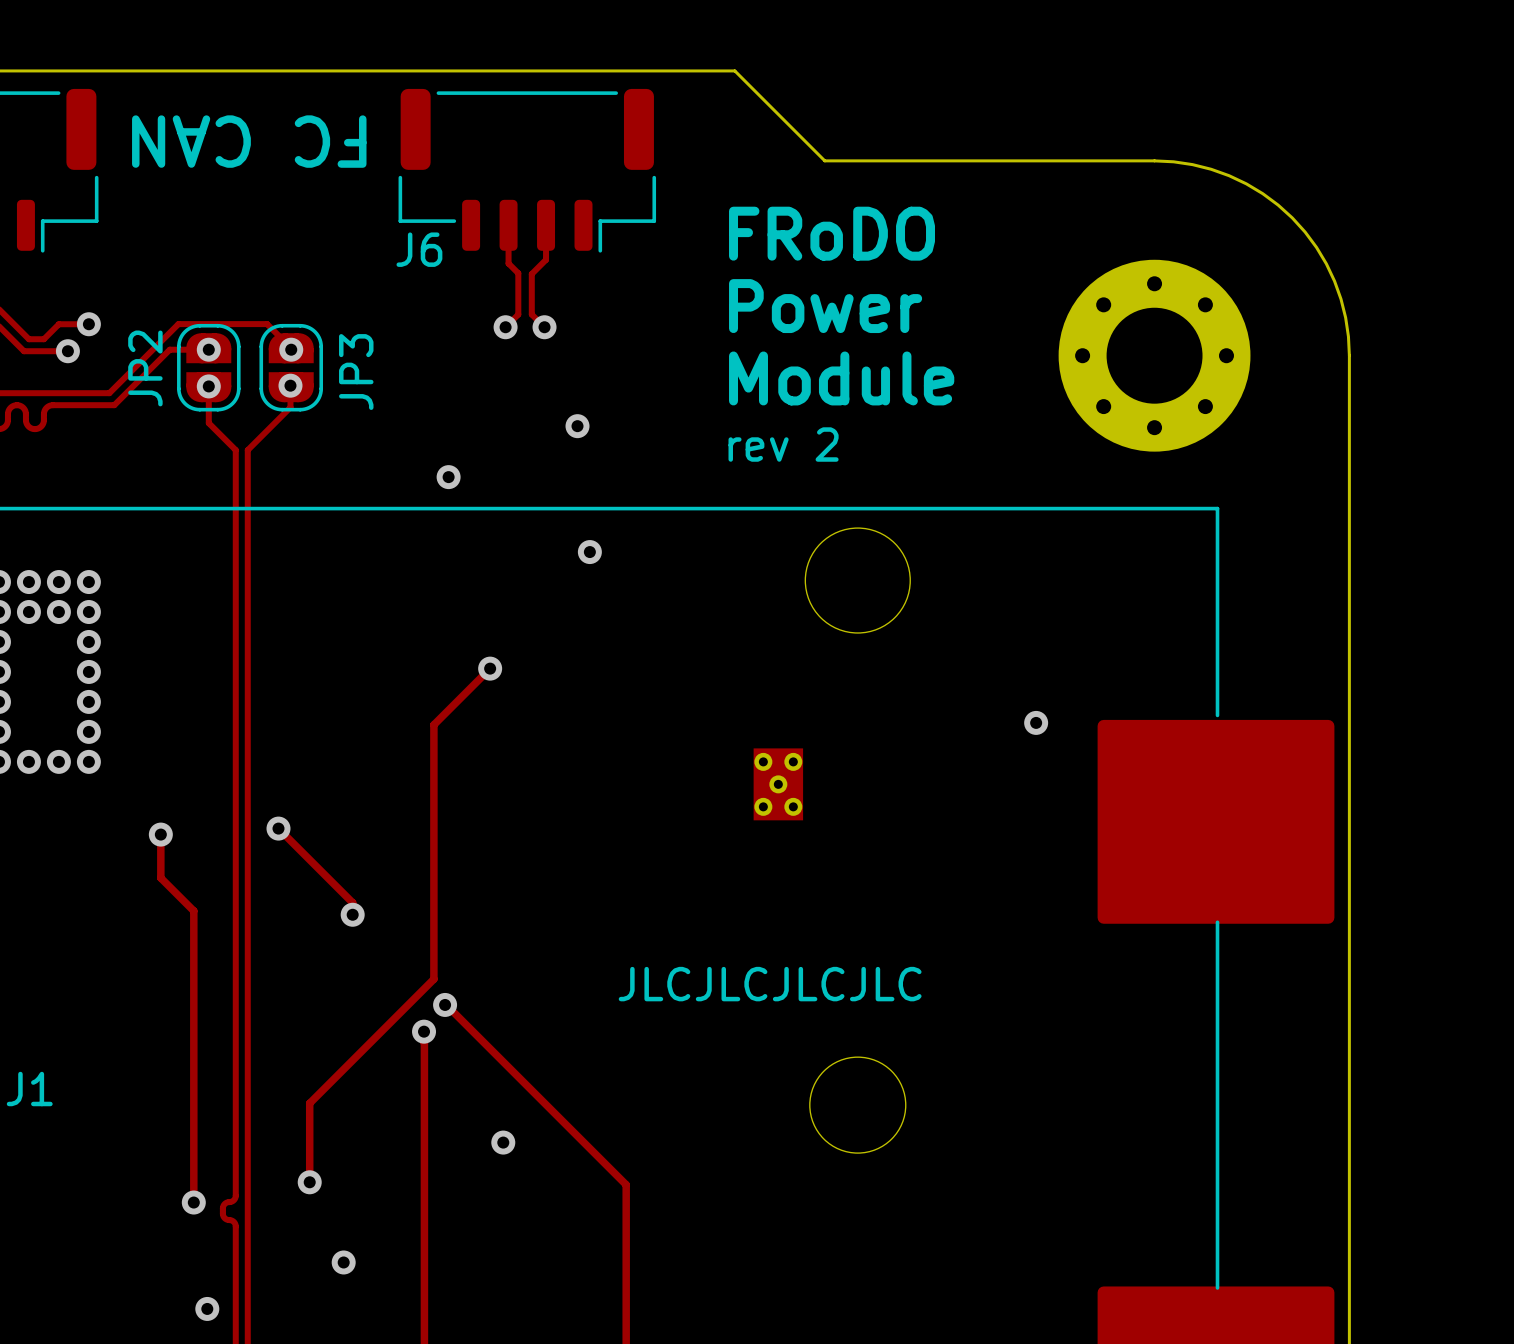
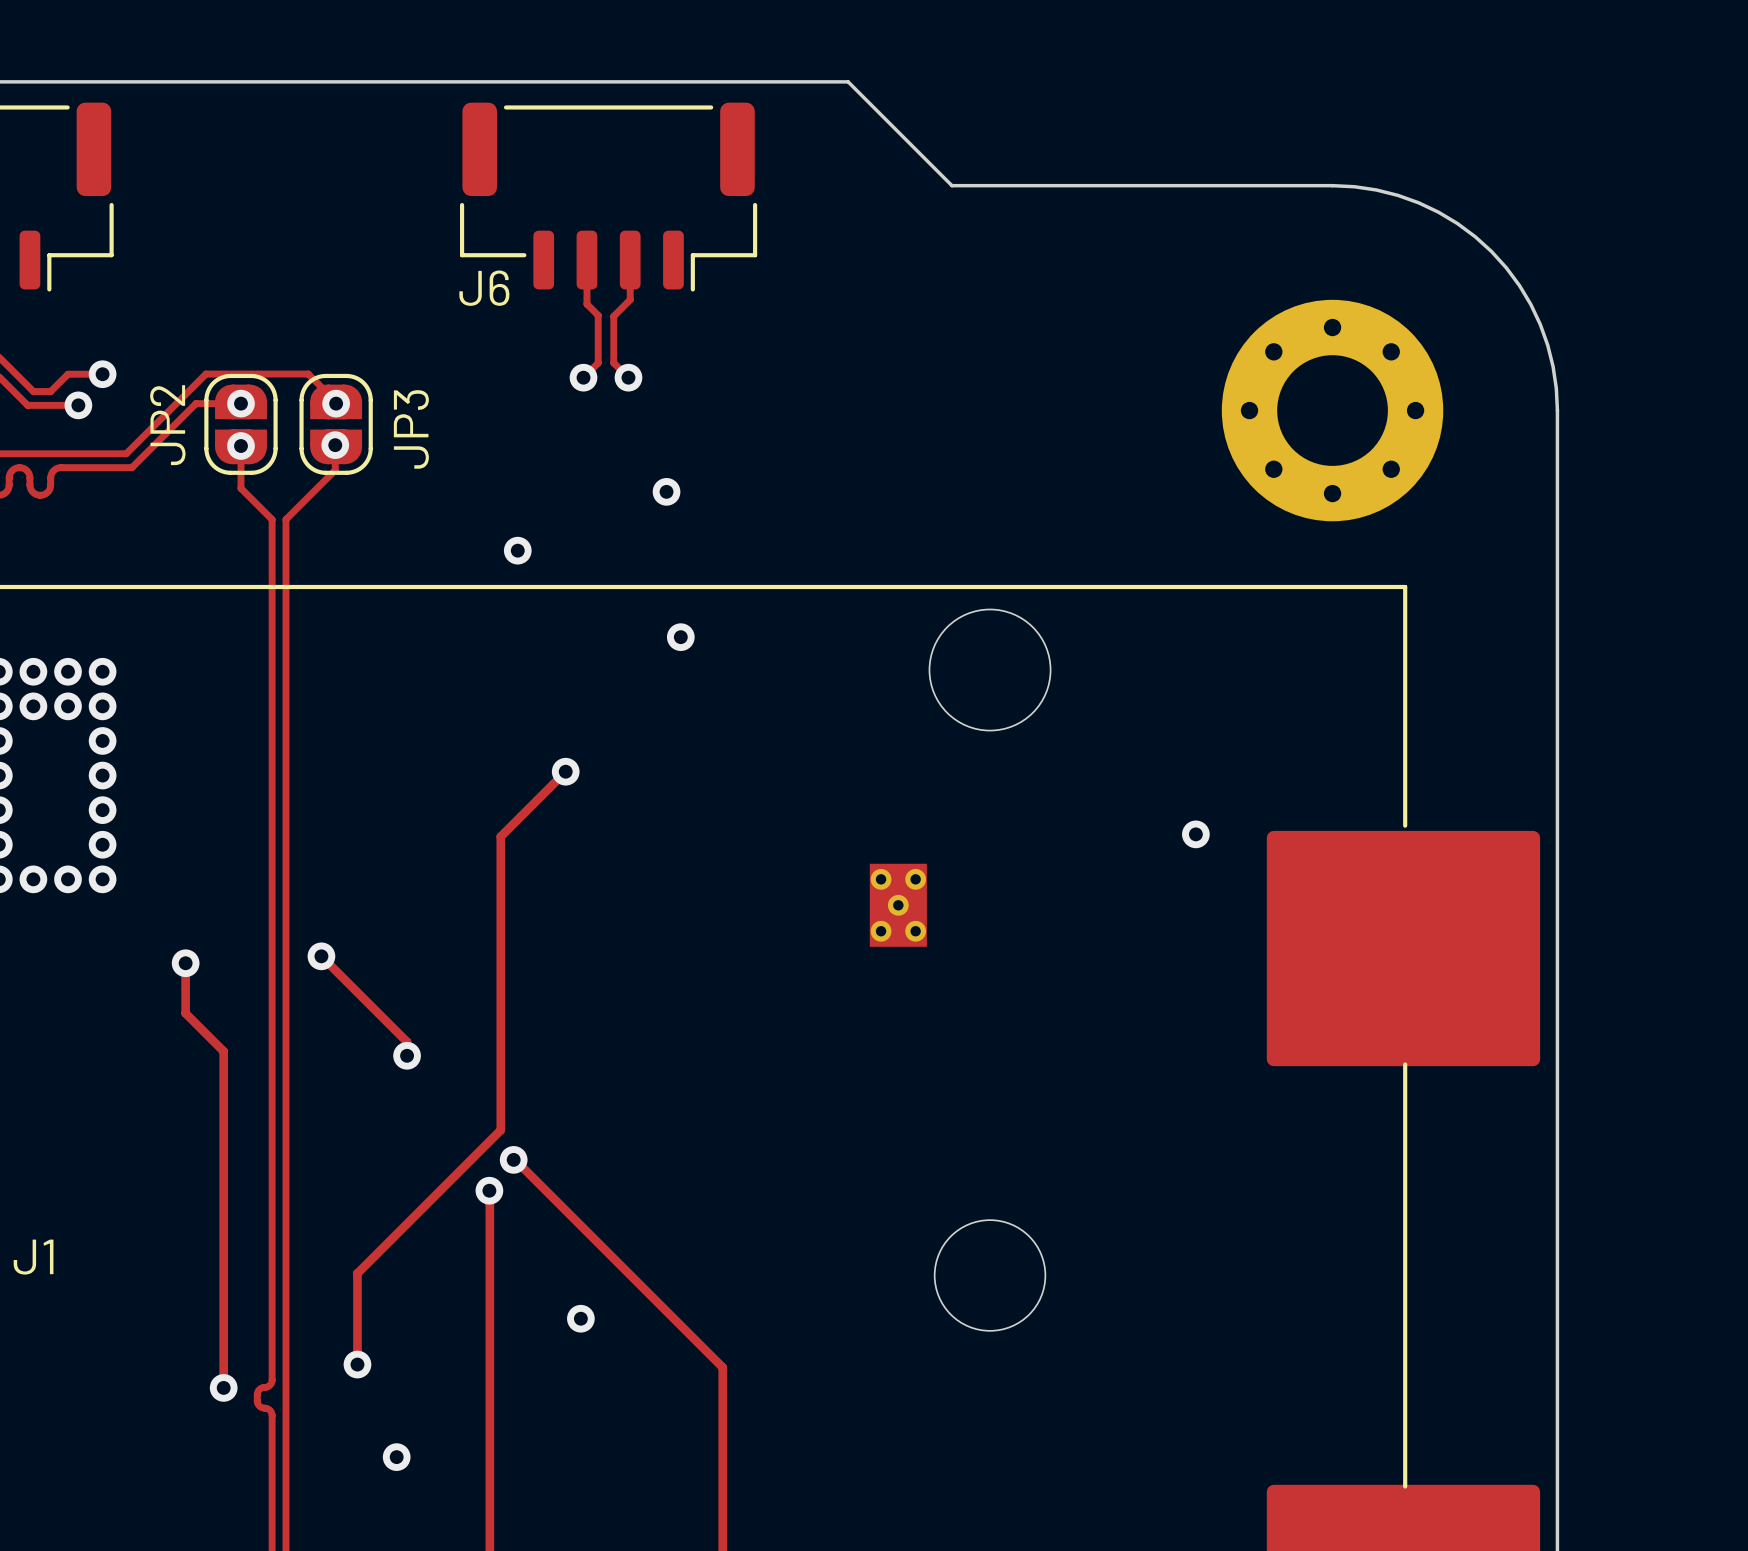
part text: FC CAN (249, 141) -> none
text: FRoDO (832, 233) -> none
text: Power (825, 306) -> none
text: Module (841, 378) -> none
text: rev 2 (783, 444) -> none
text: JLCJLCJLCJLC (770, 984) -> none
via: (207, 1308) -> none

